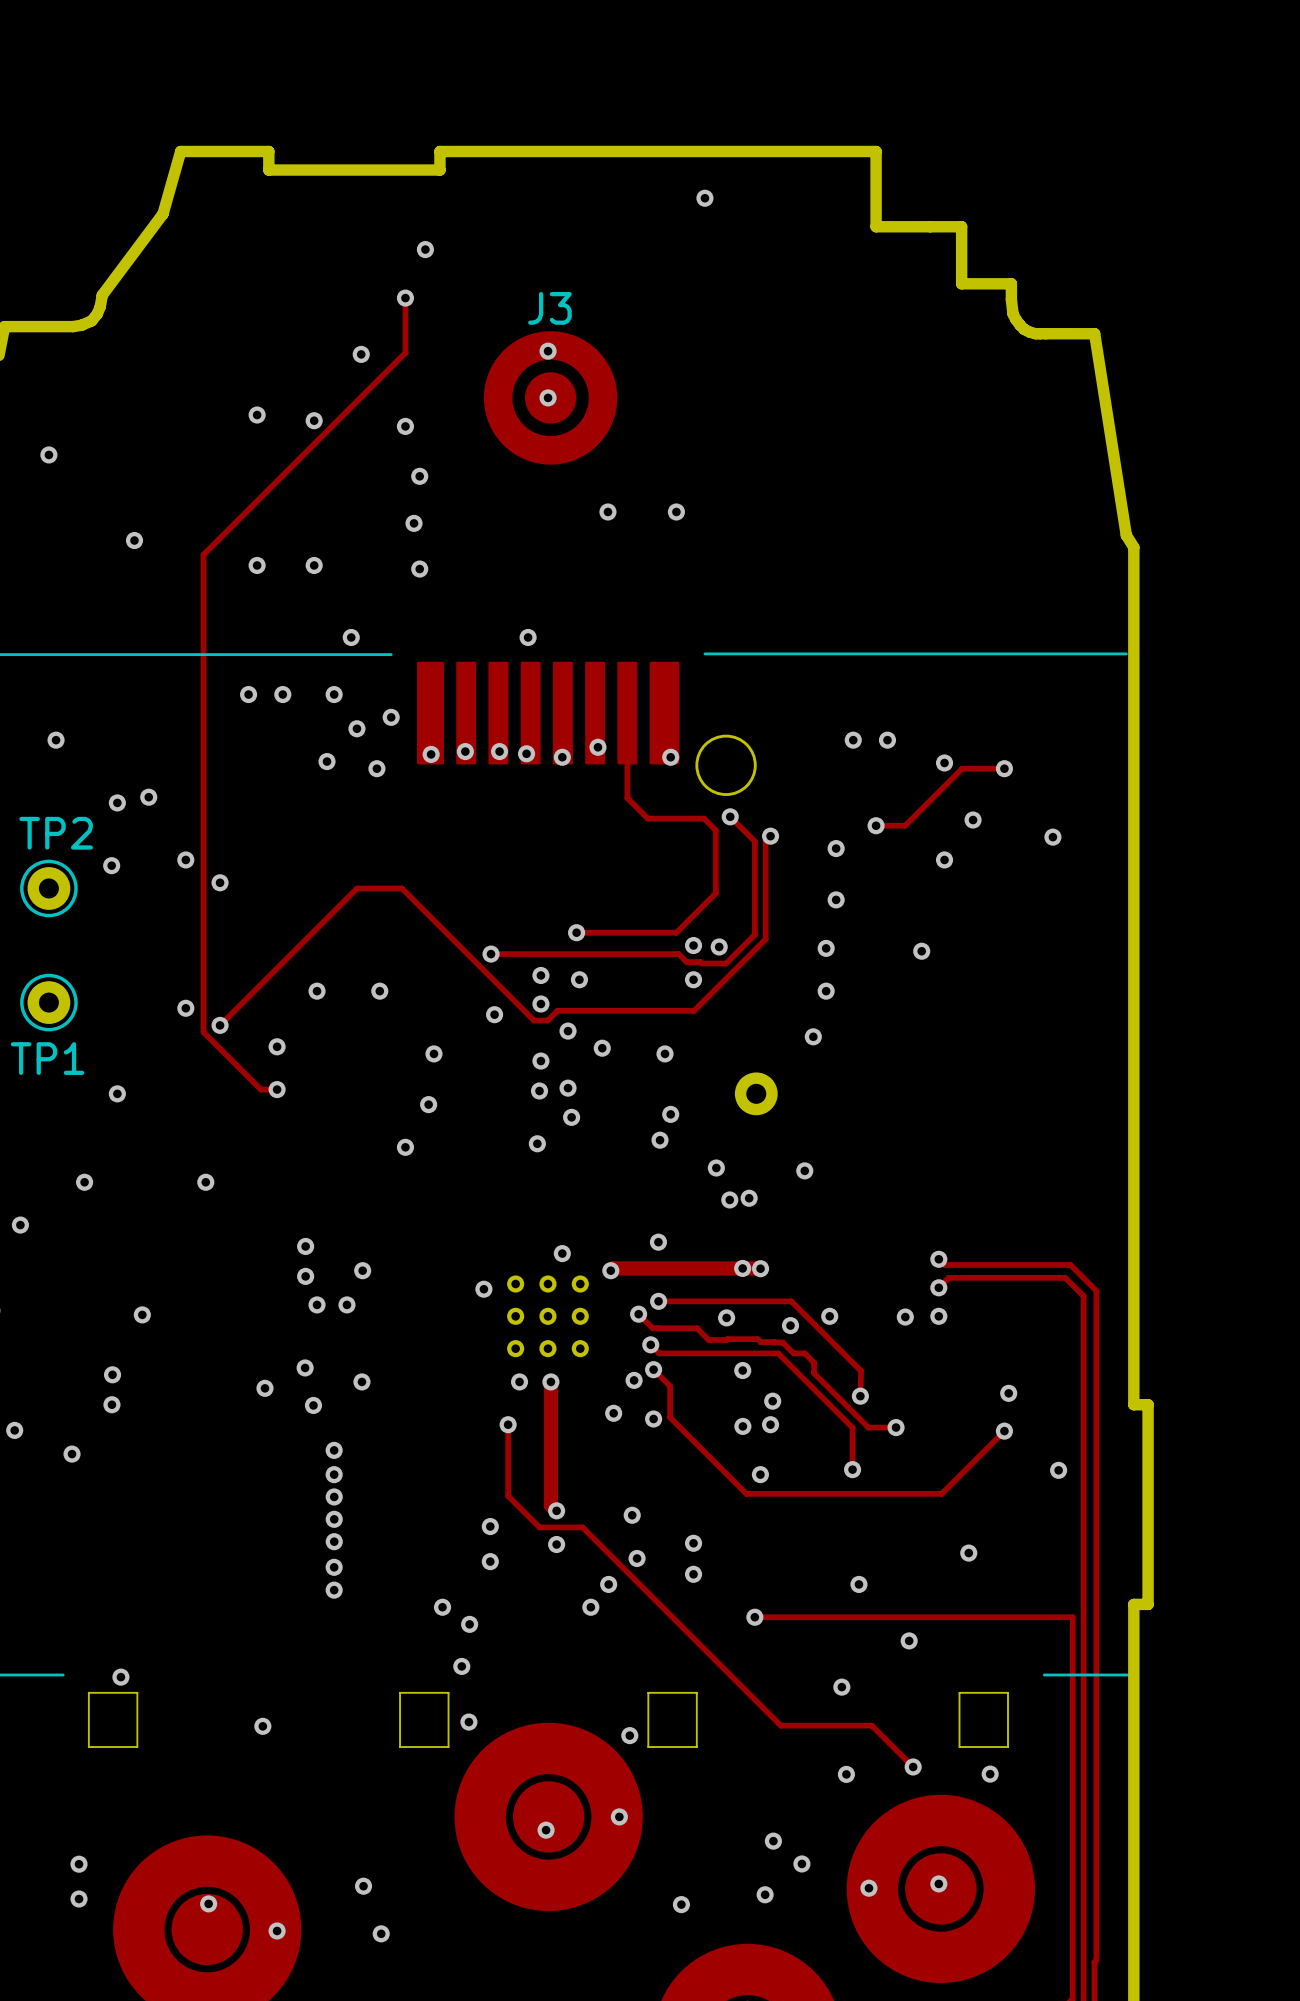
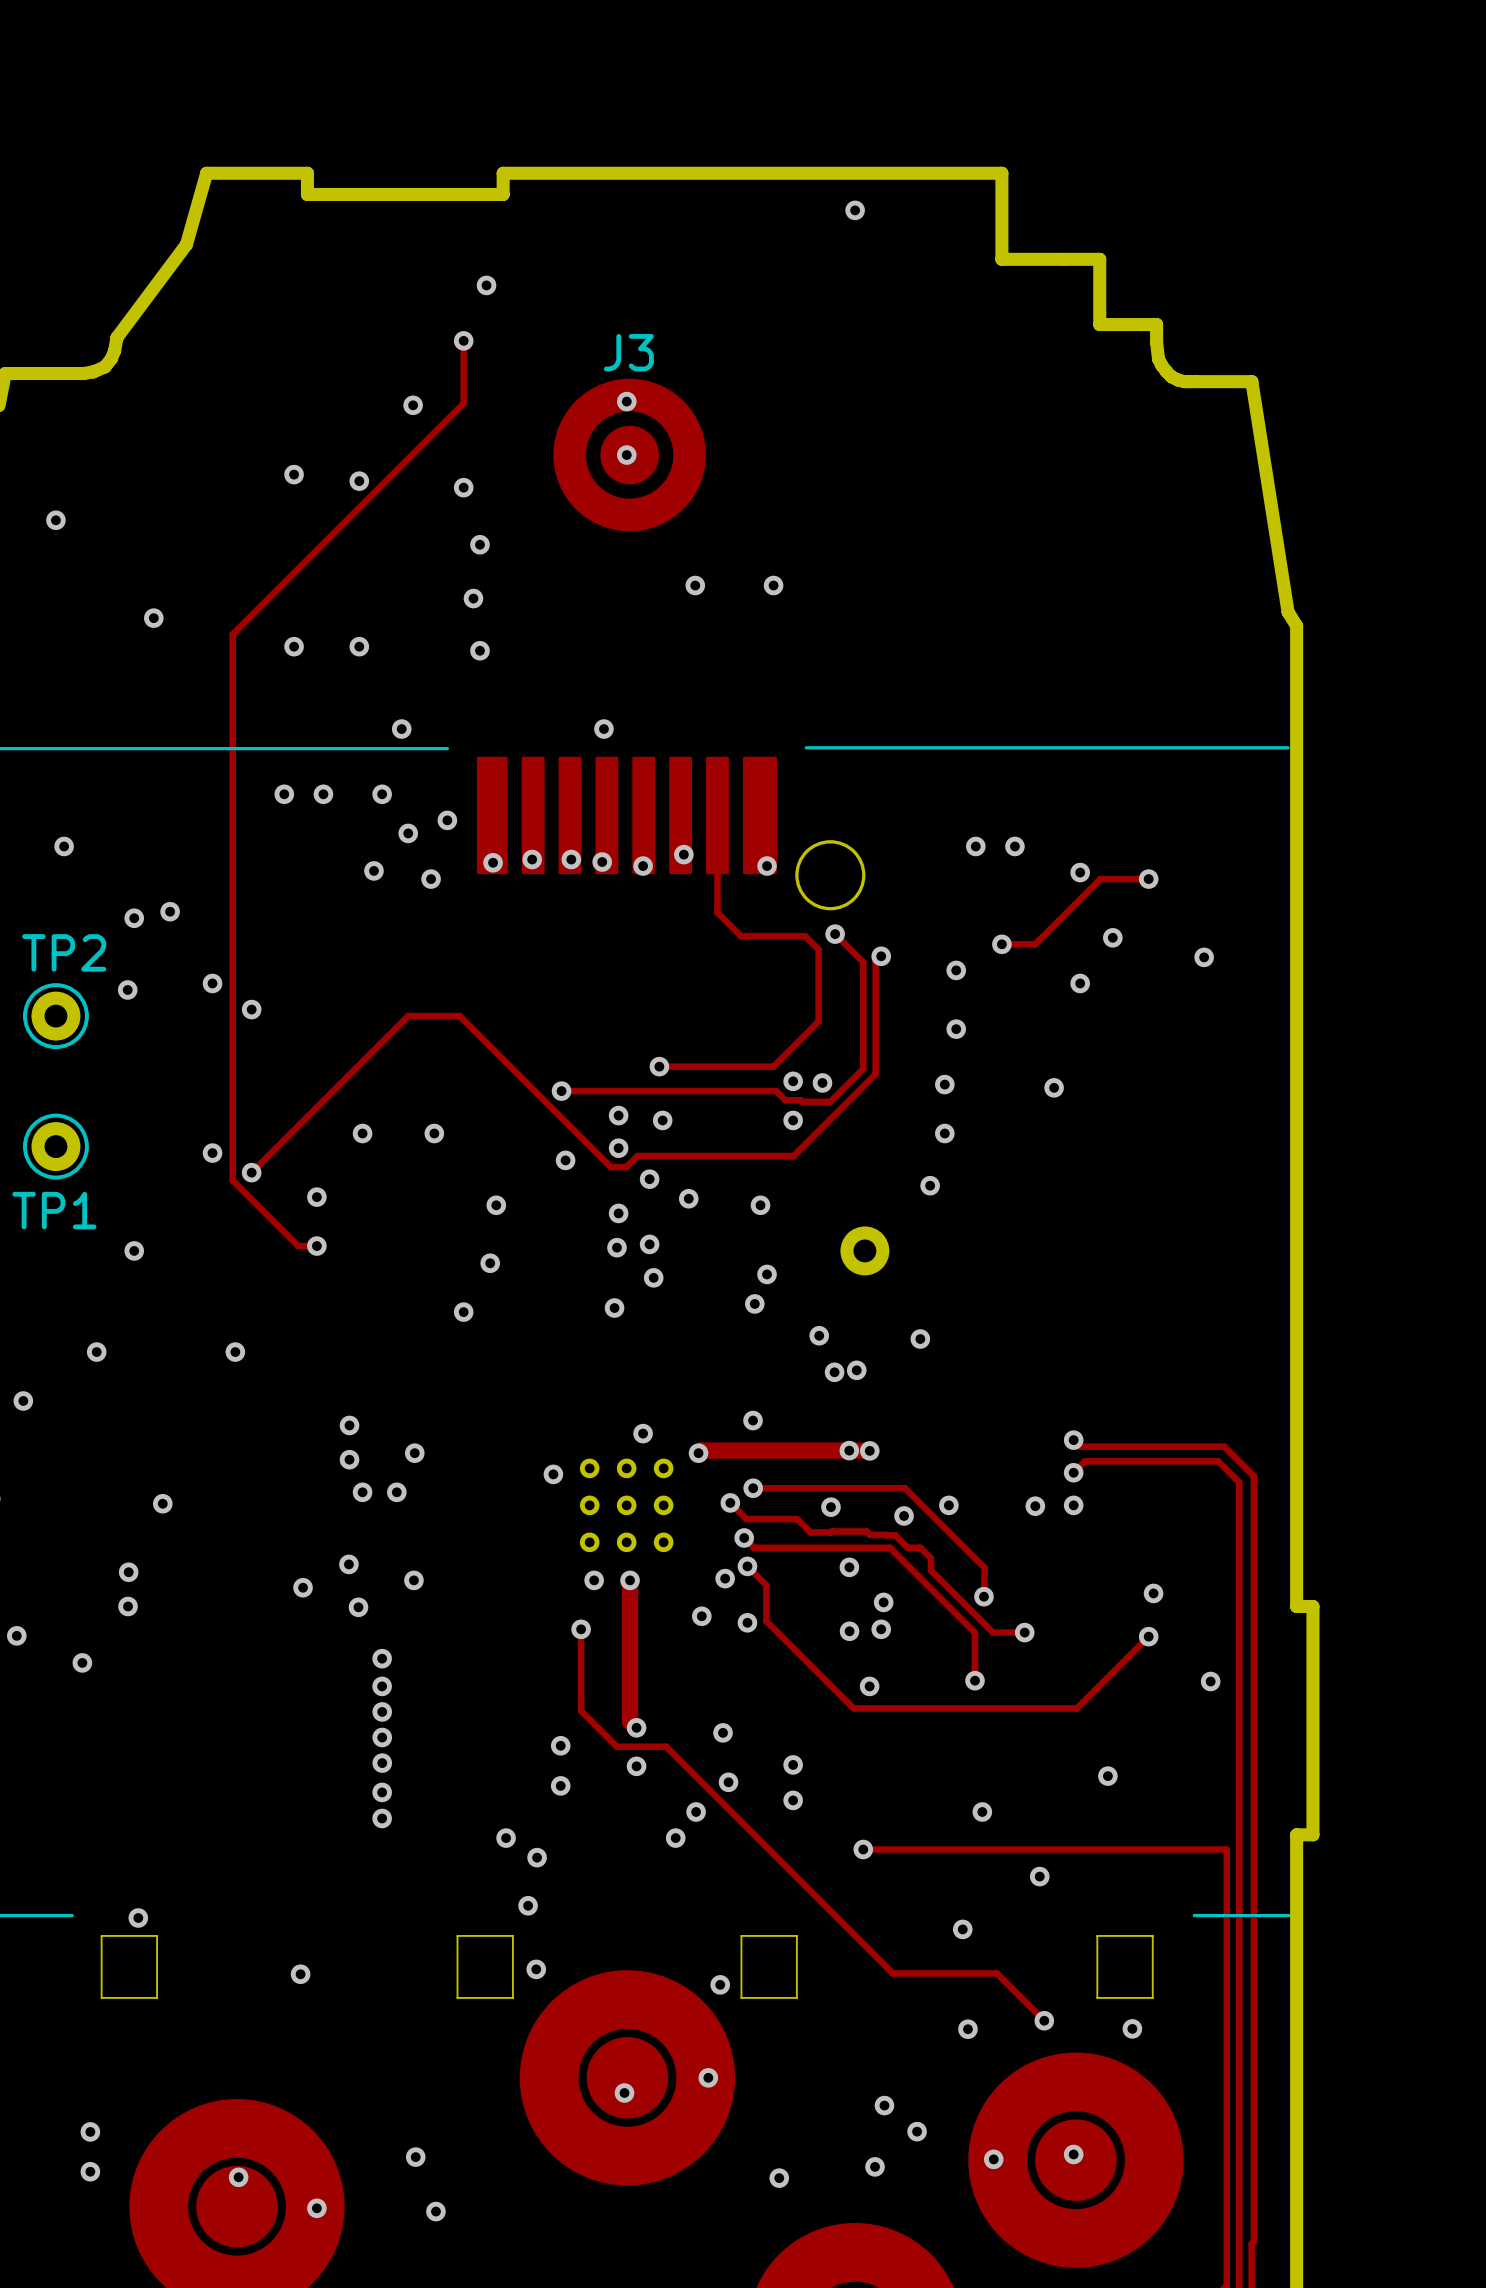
via position: (704, 198) -> (855, 210)

